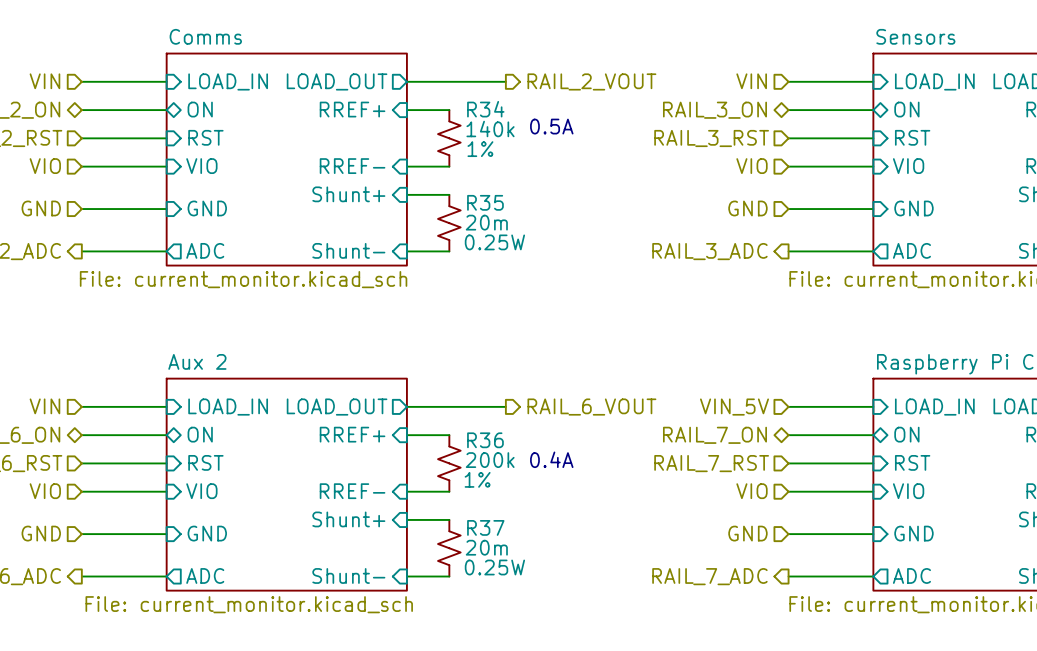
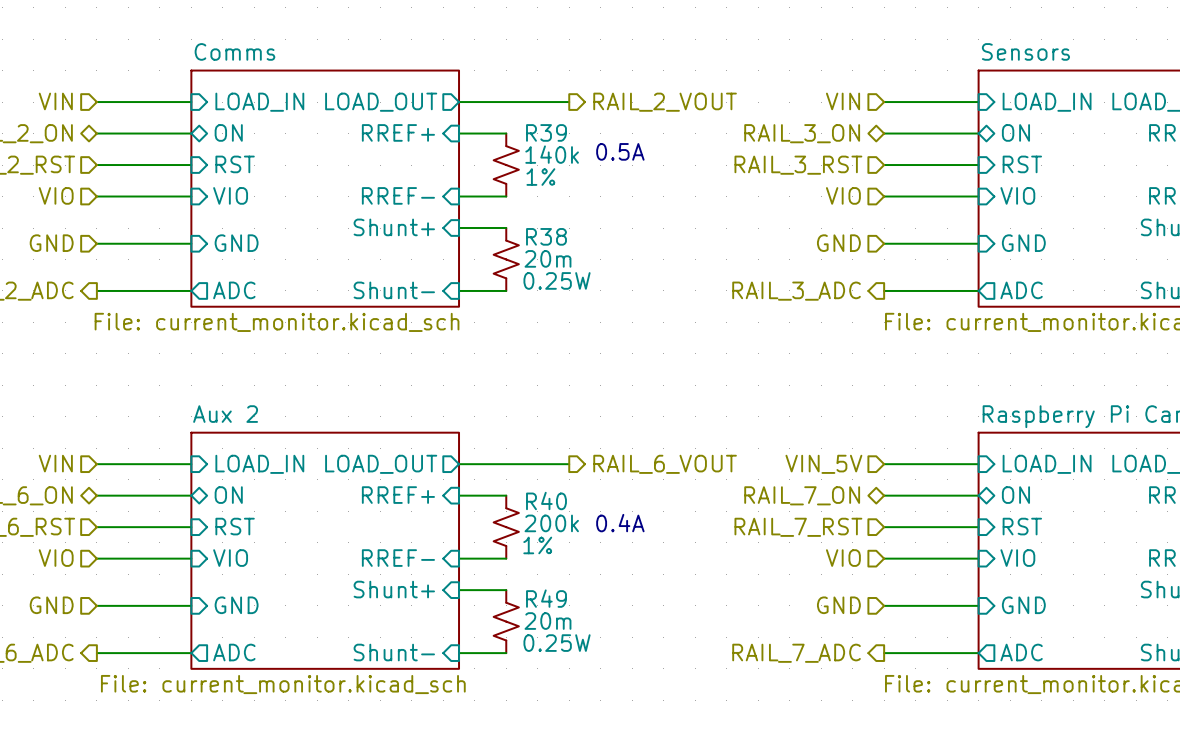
R34 name: R34 (485, 109) -> R39 (546, 132)
R35 name: R35 (485, 202) -> R38 (546, 236)
R36 name: R36 (485, 440) -> R40 (546, 500)
R37 name: R37 (485, 527) -> R49 (546, 598)

